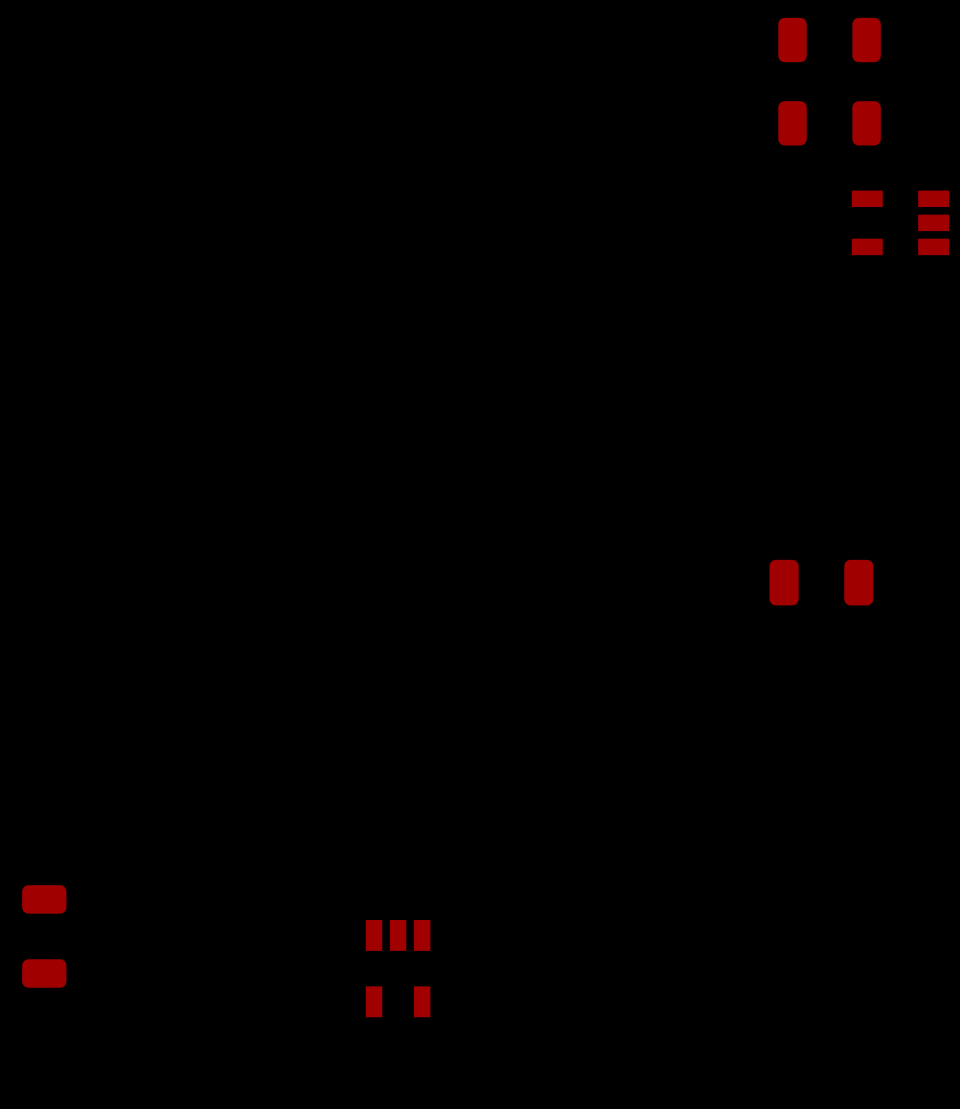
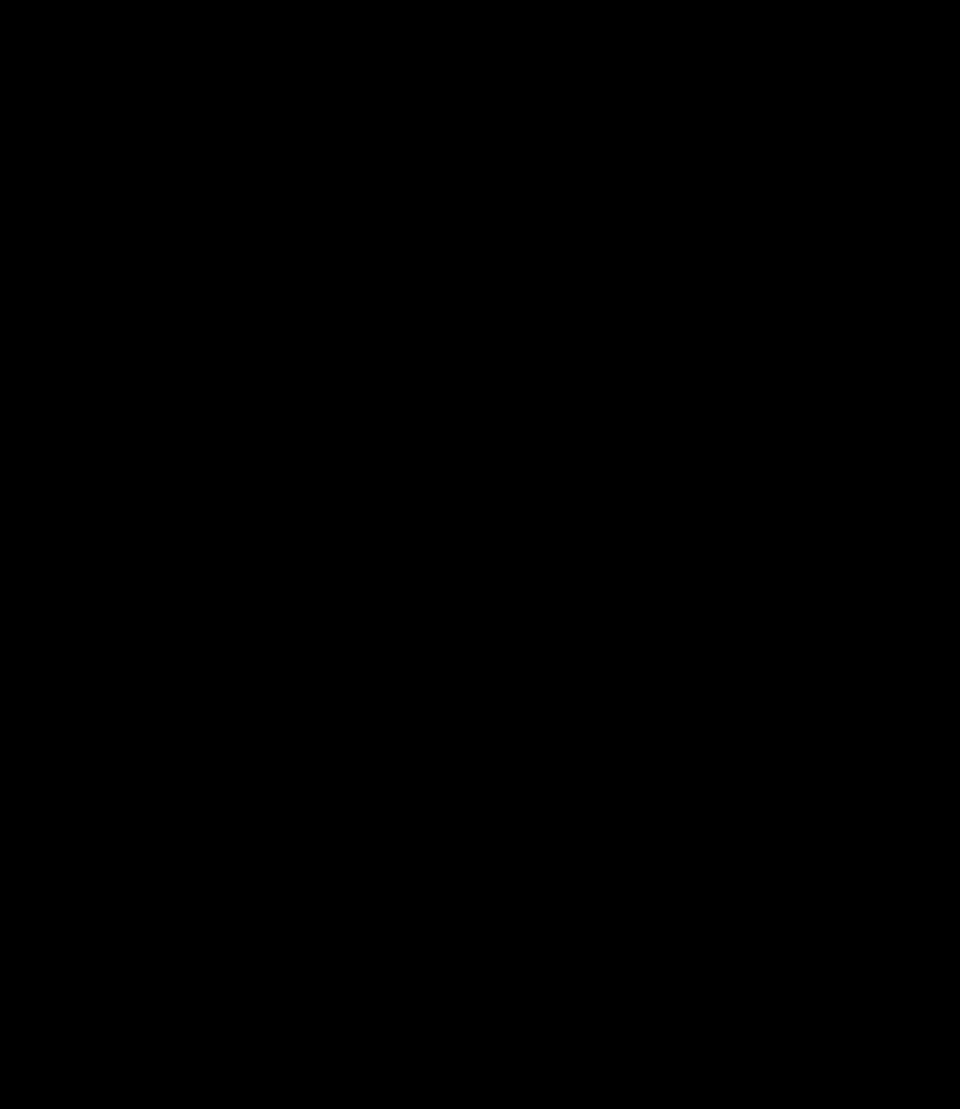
part: (829, 40) -> none
part: (829, 123) -> none
part: (900, 222) -> none
part: (821, 582) -> none
part: (44, 936) -> none
part: (398, 968) -> none

